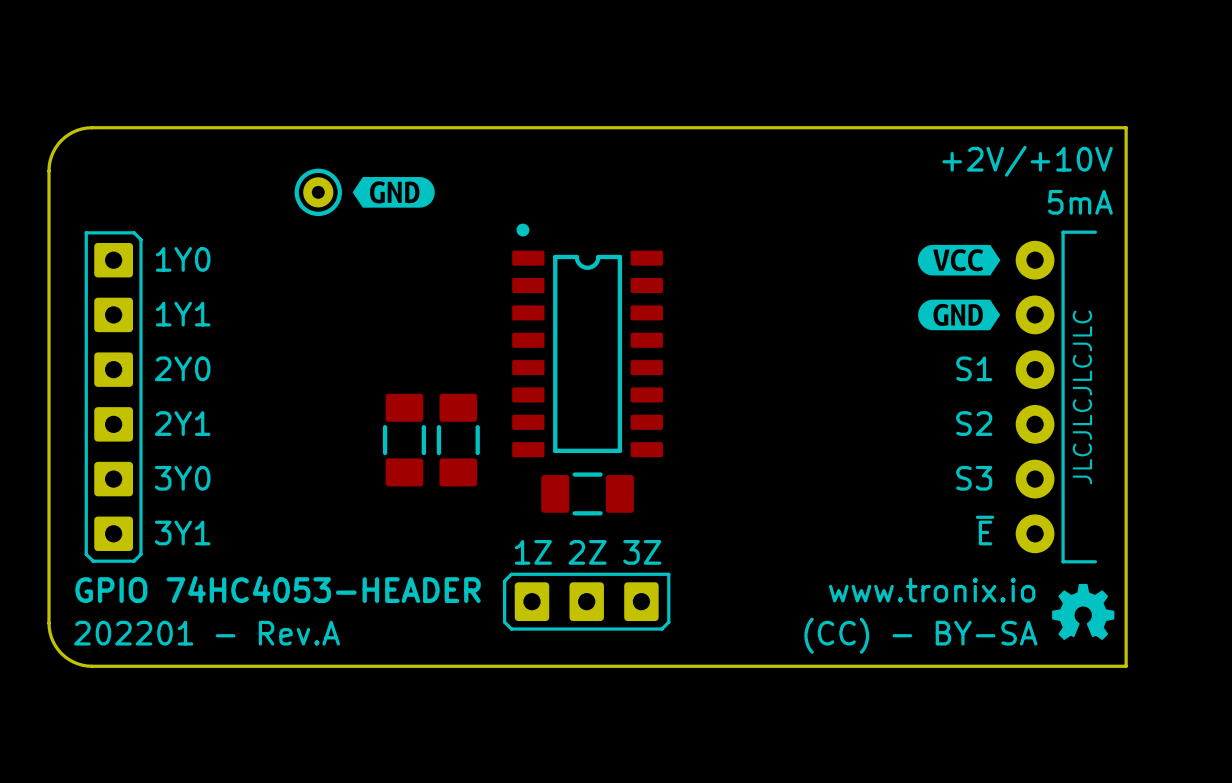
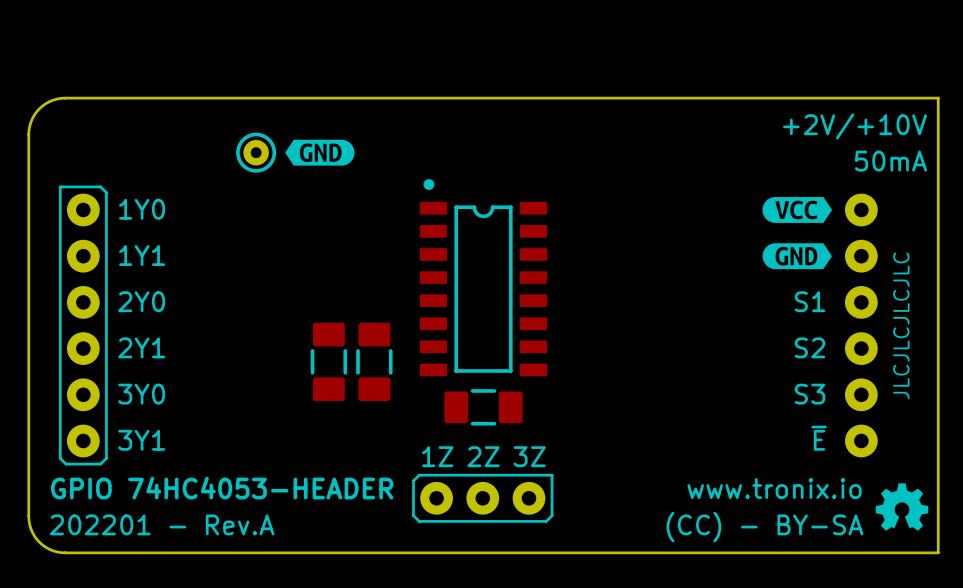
text: 5mA (1080, 202) -> 50mA (890, 161)
part footprint: [1015, 230, 1098, 564] -> [845, 193, 878, 458]
part footprint: [84, 231, 143, 563] -> [58, 185, 108, 466]
part footprint: [503, 572, 671, 631] -> [412, 473, 554, 523]

